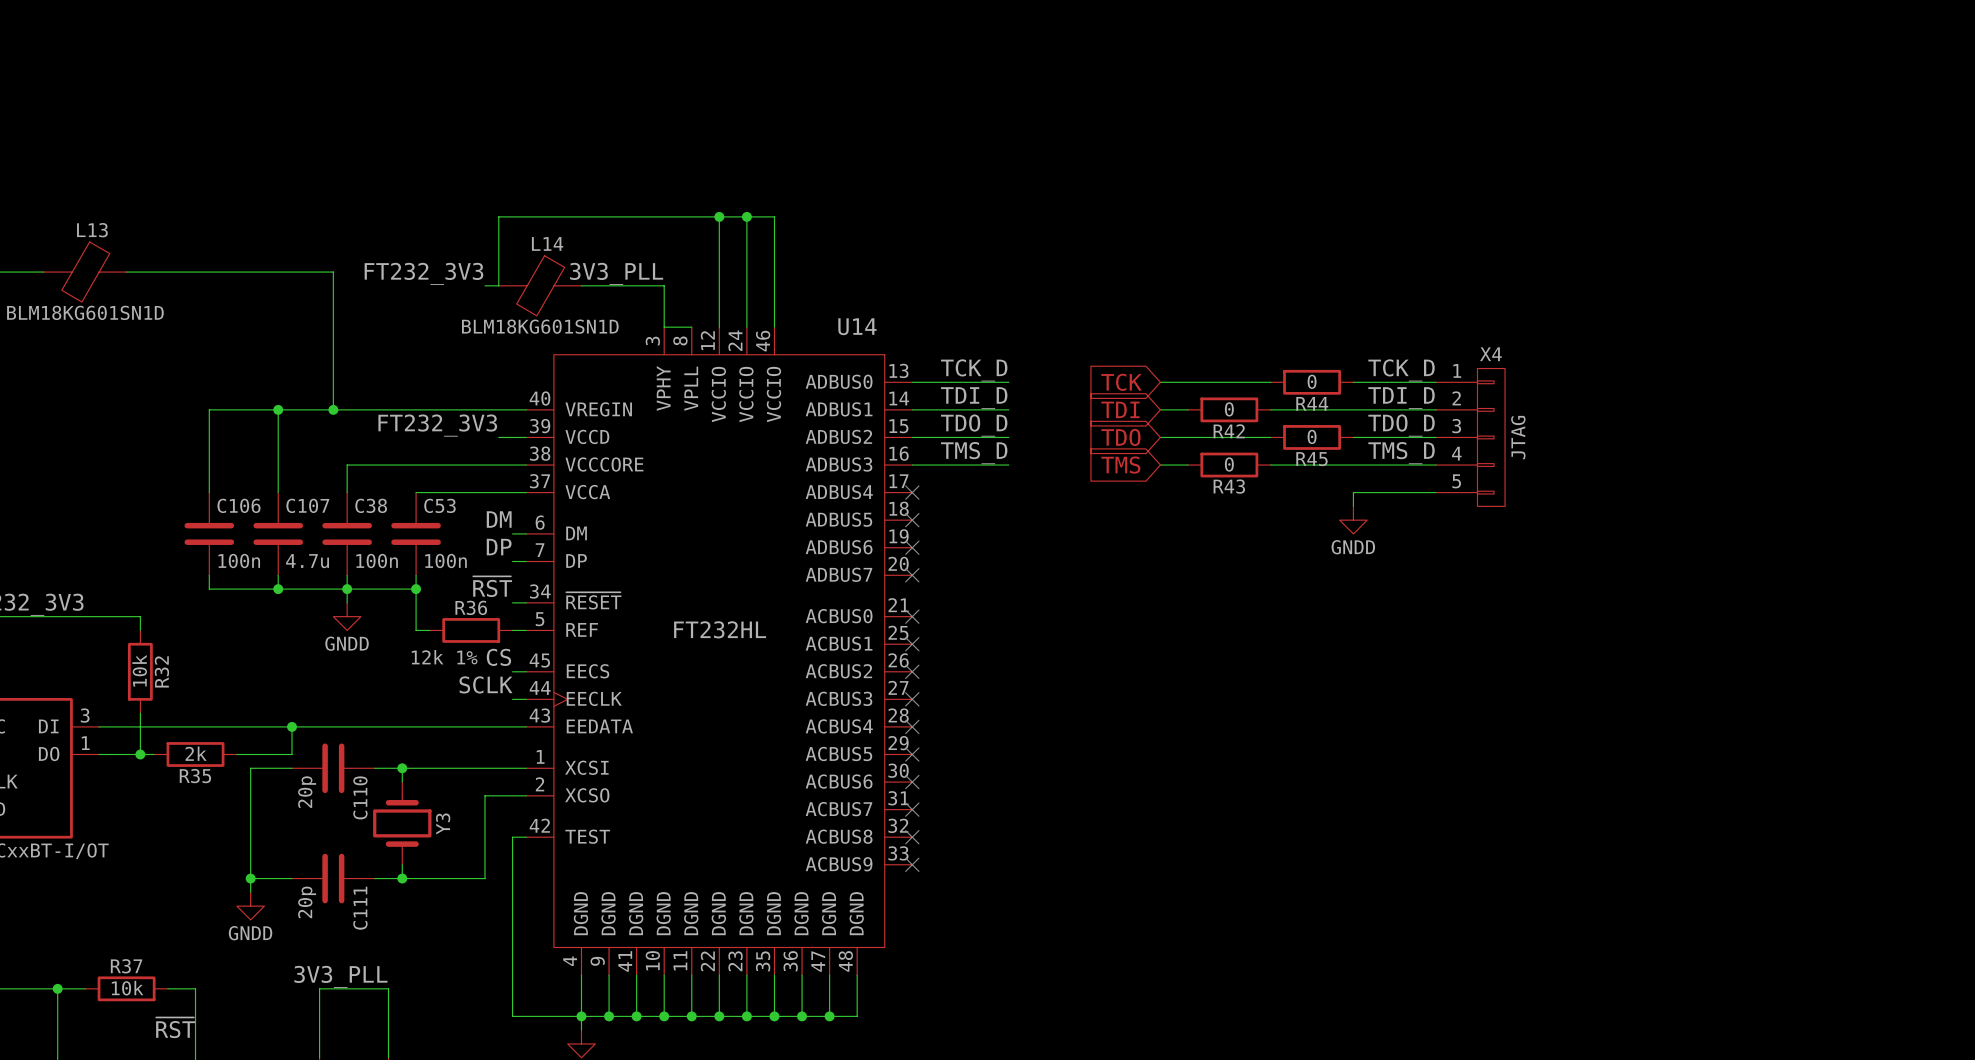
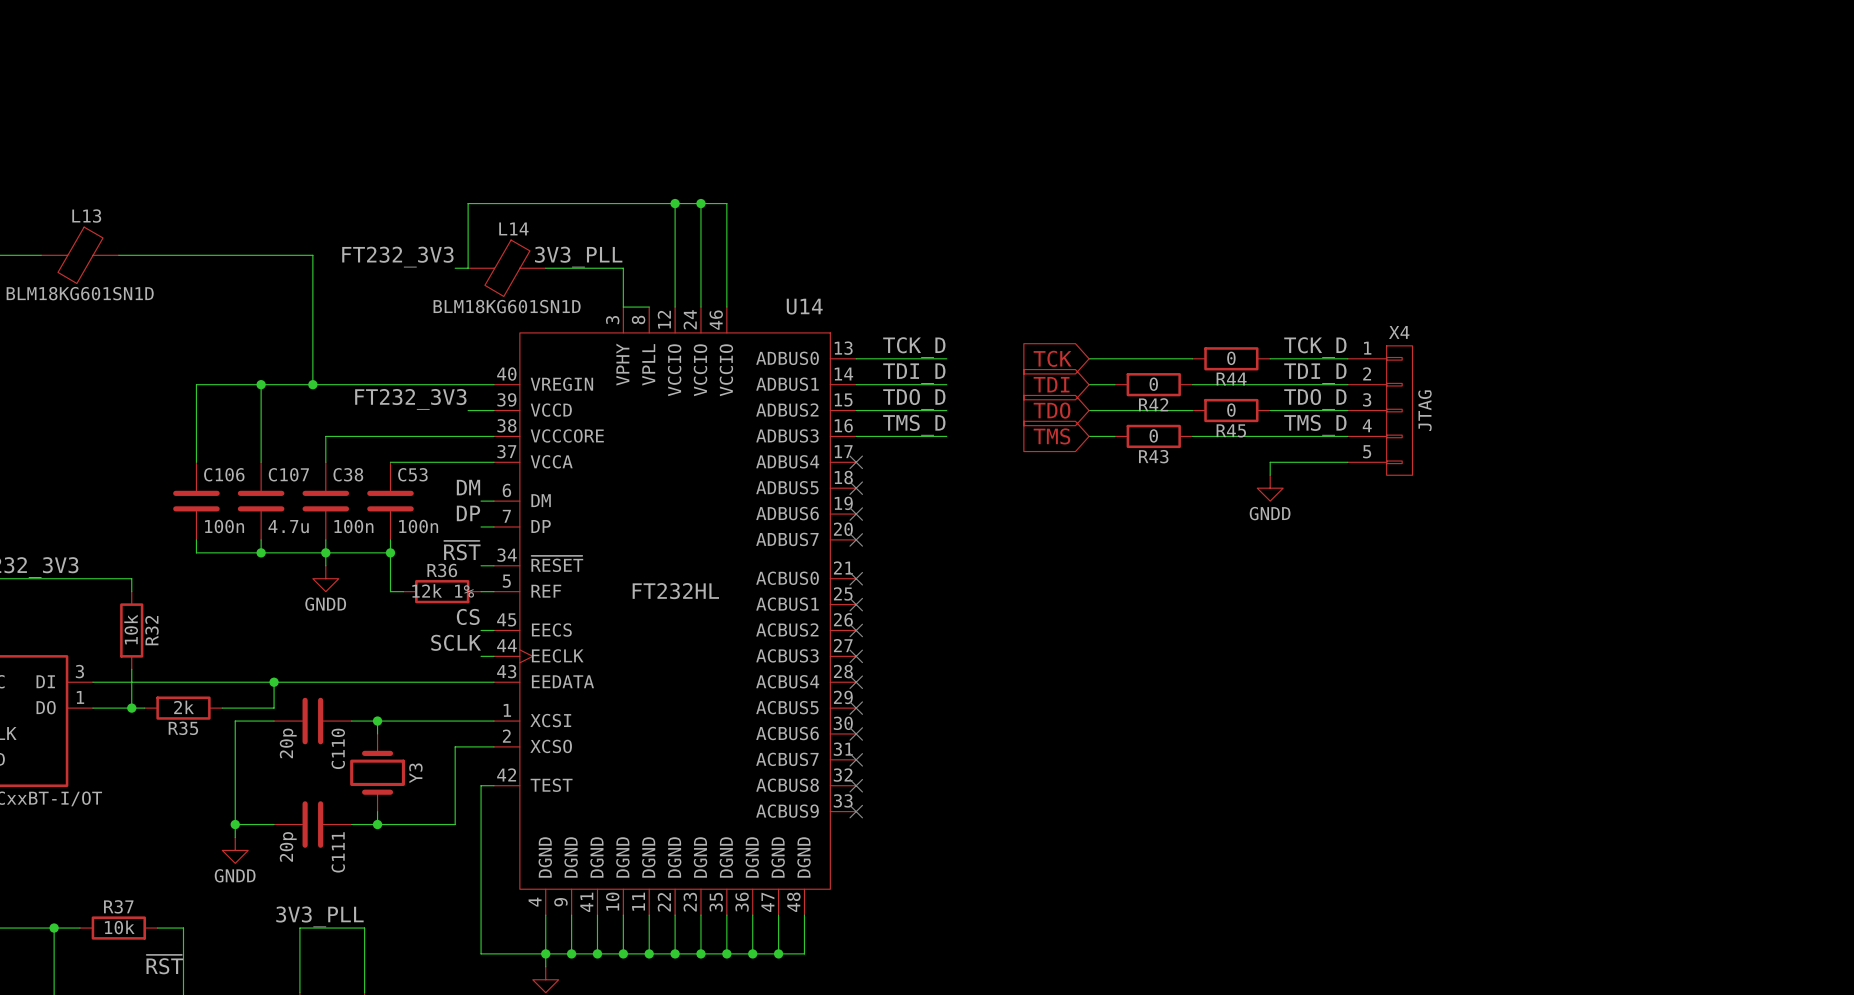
R36 value position: 12k 1% (444, 657) -> 12k 1% (443, 590)

